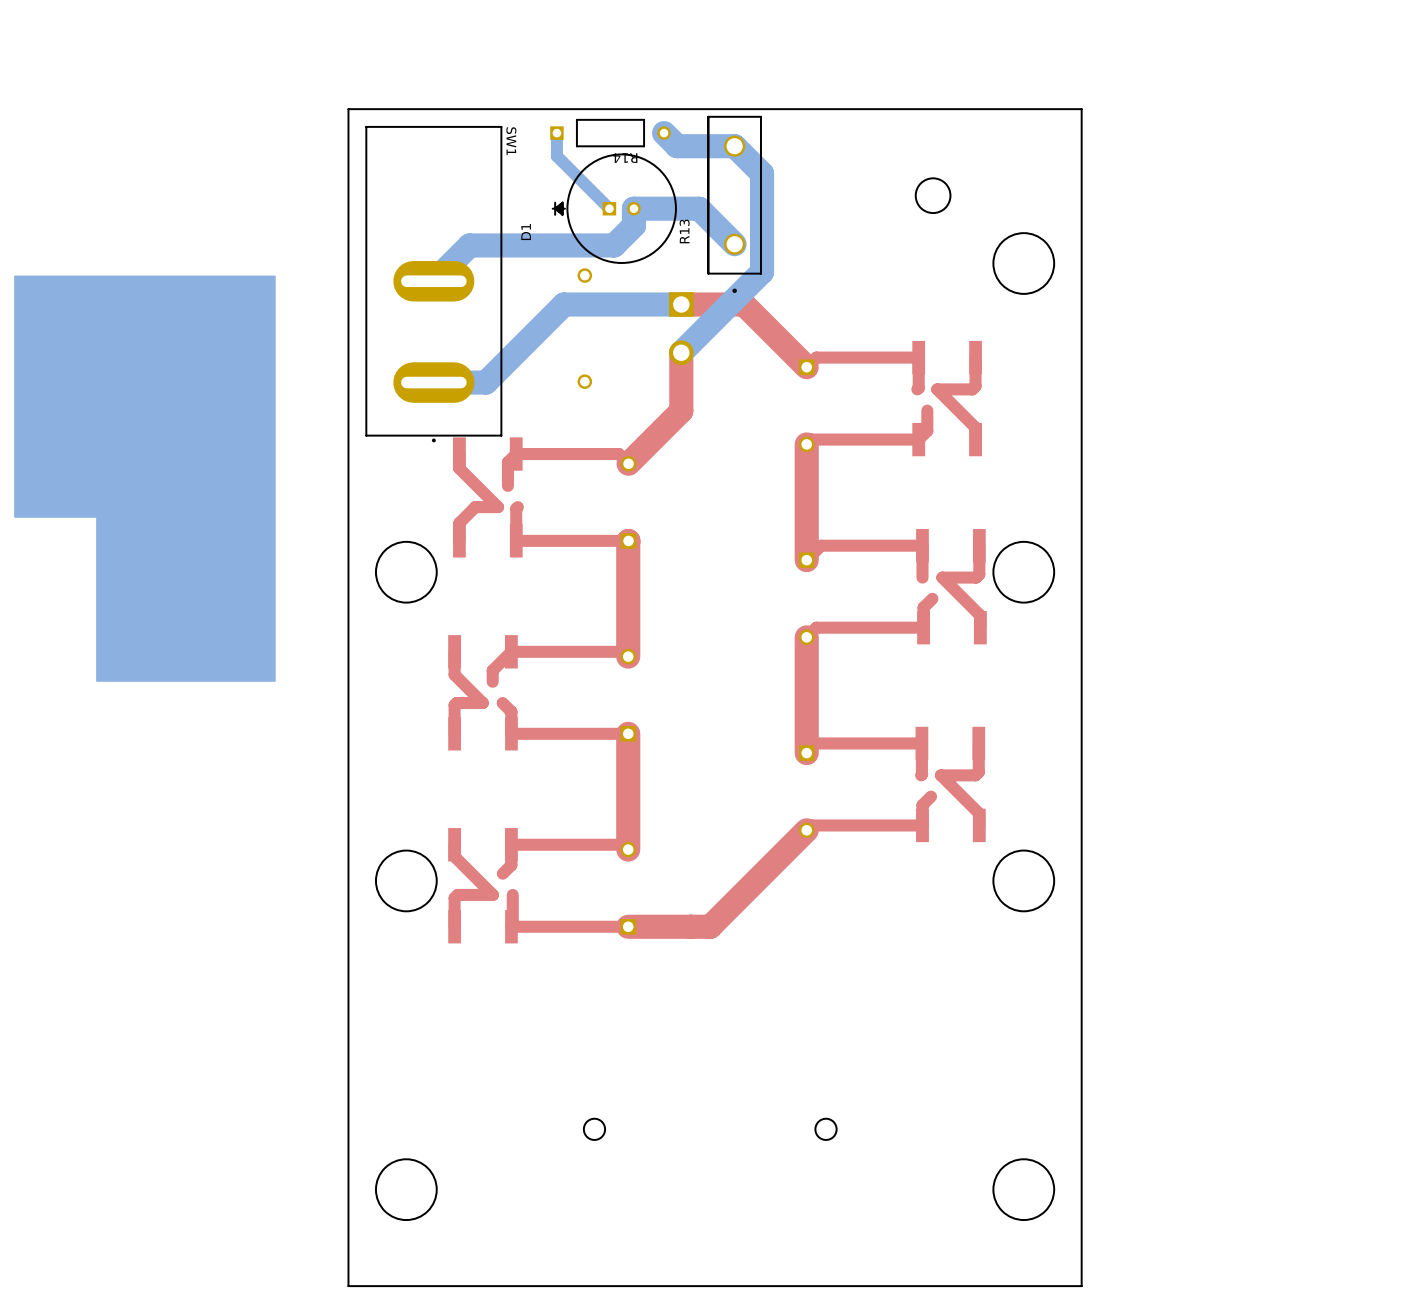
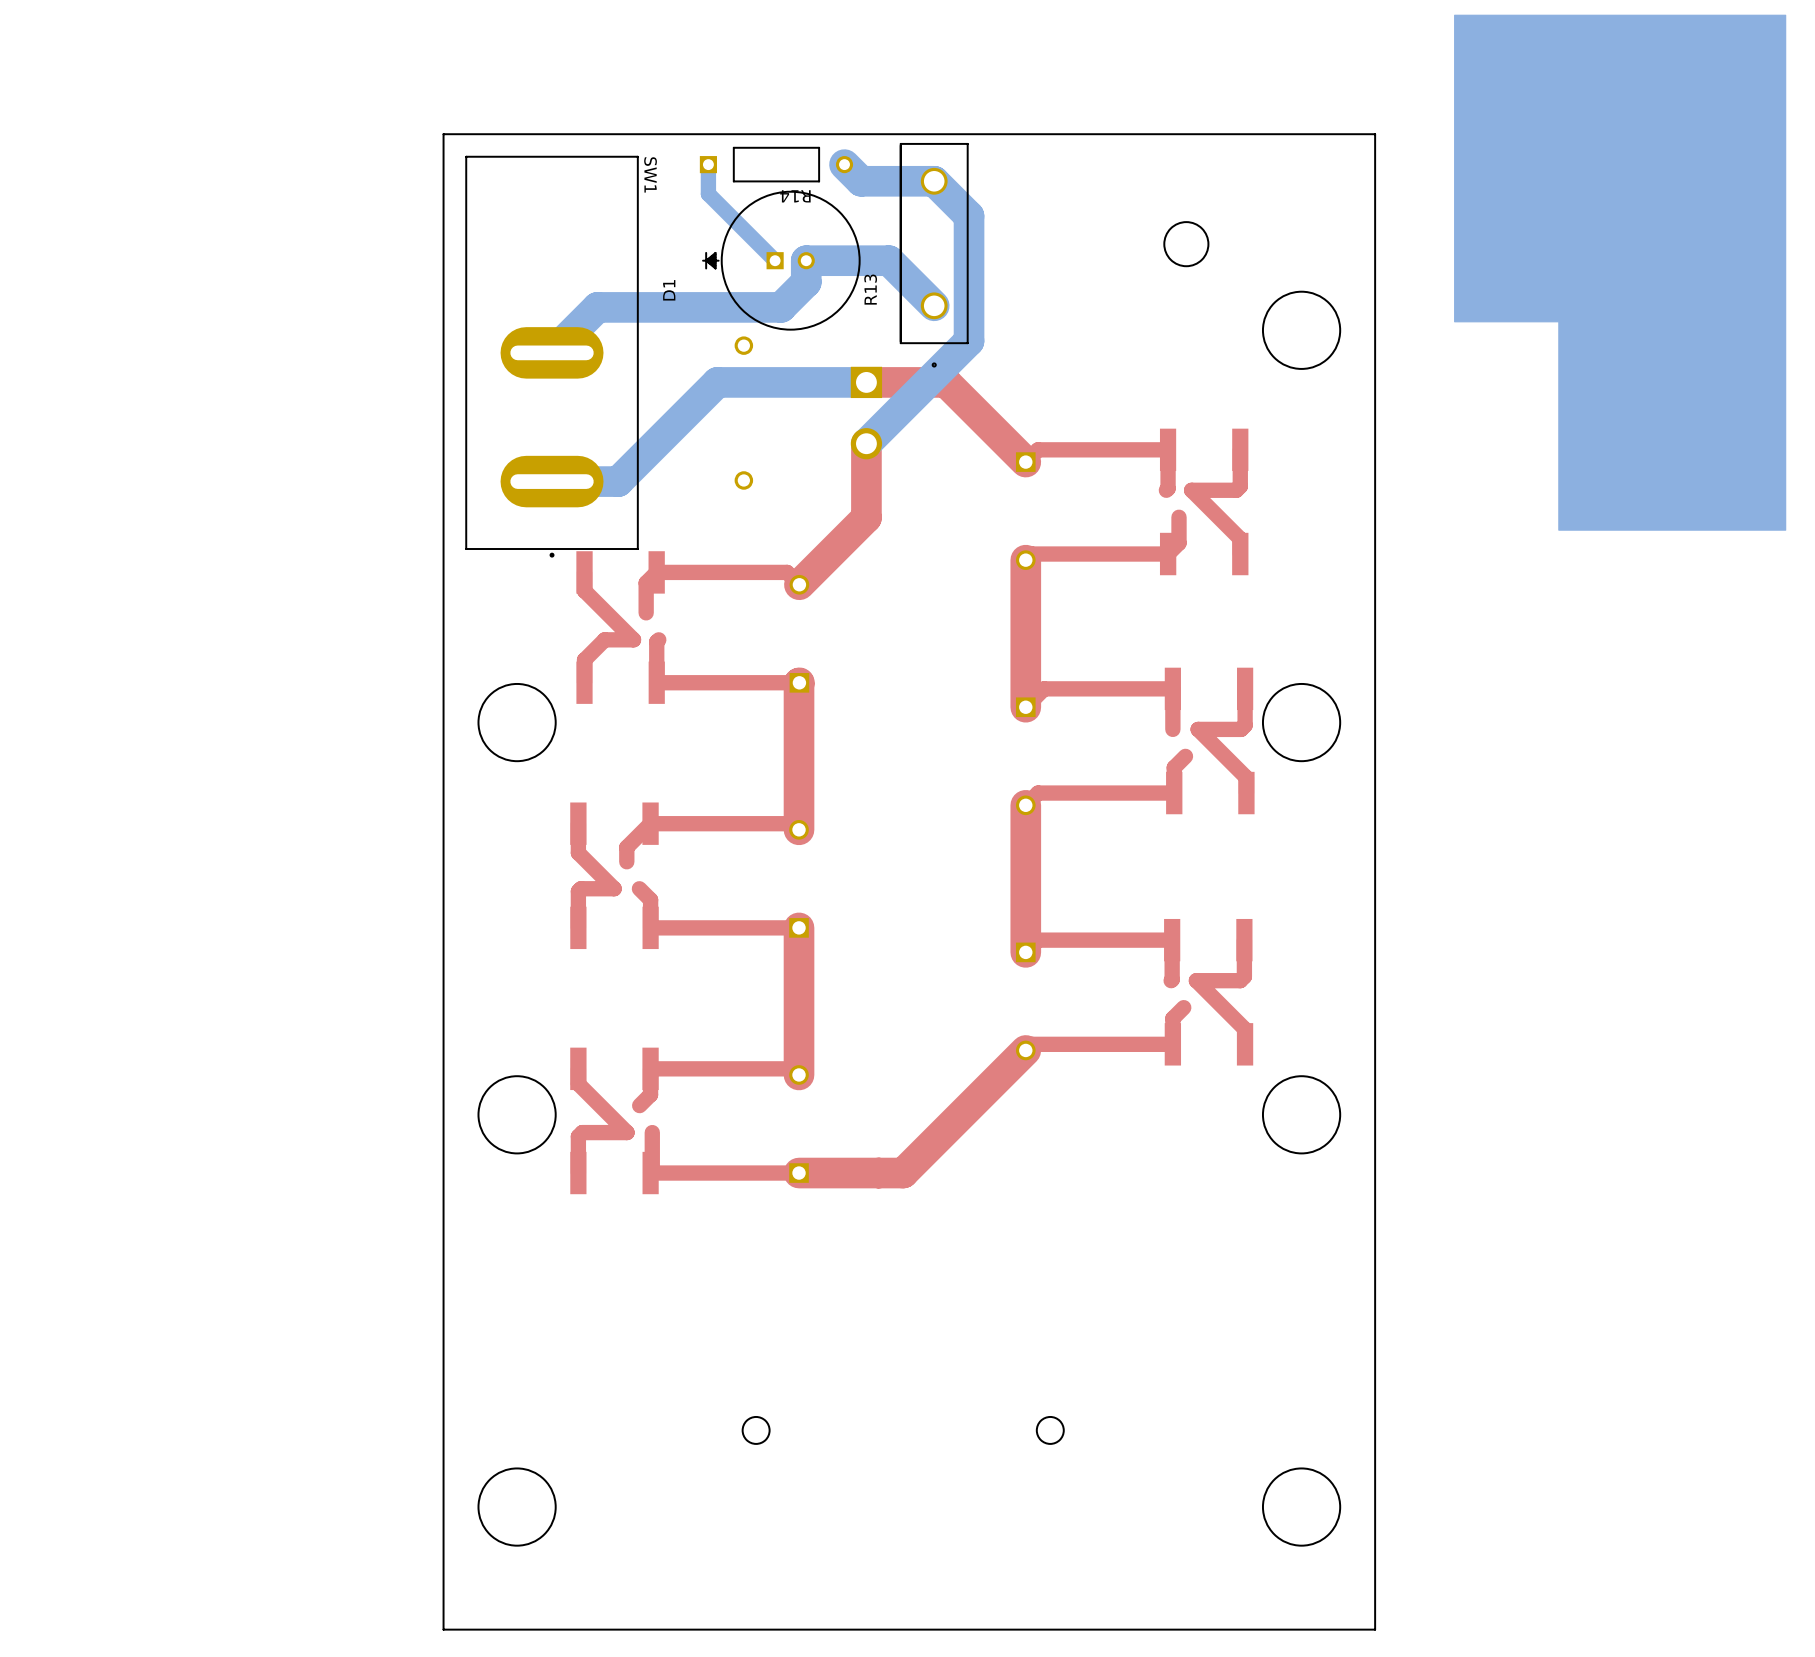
drawing: none -> [1454, 14, 1787, 531]
drawing: [14, 275, 276, 682] -> none

